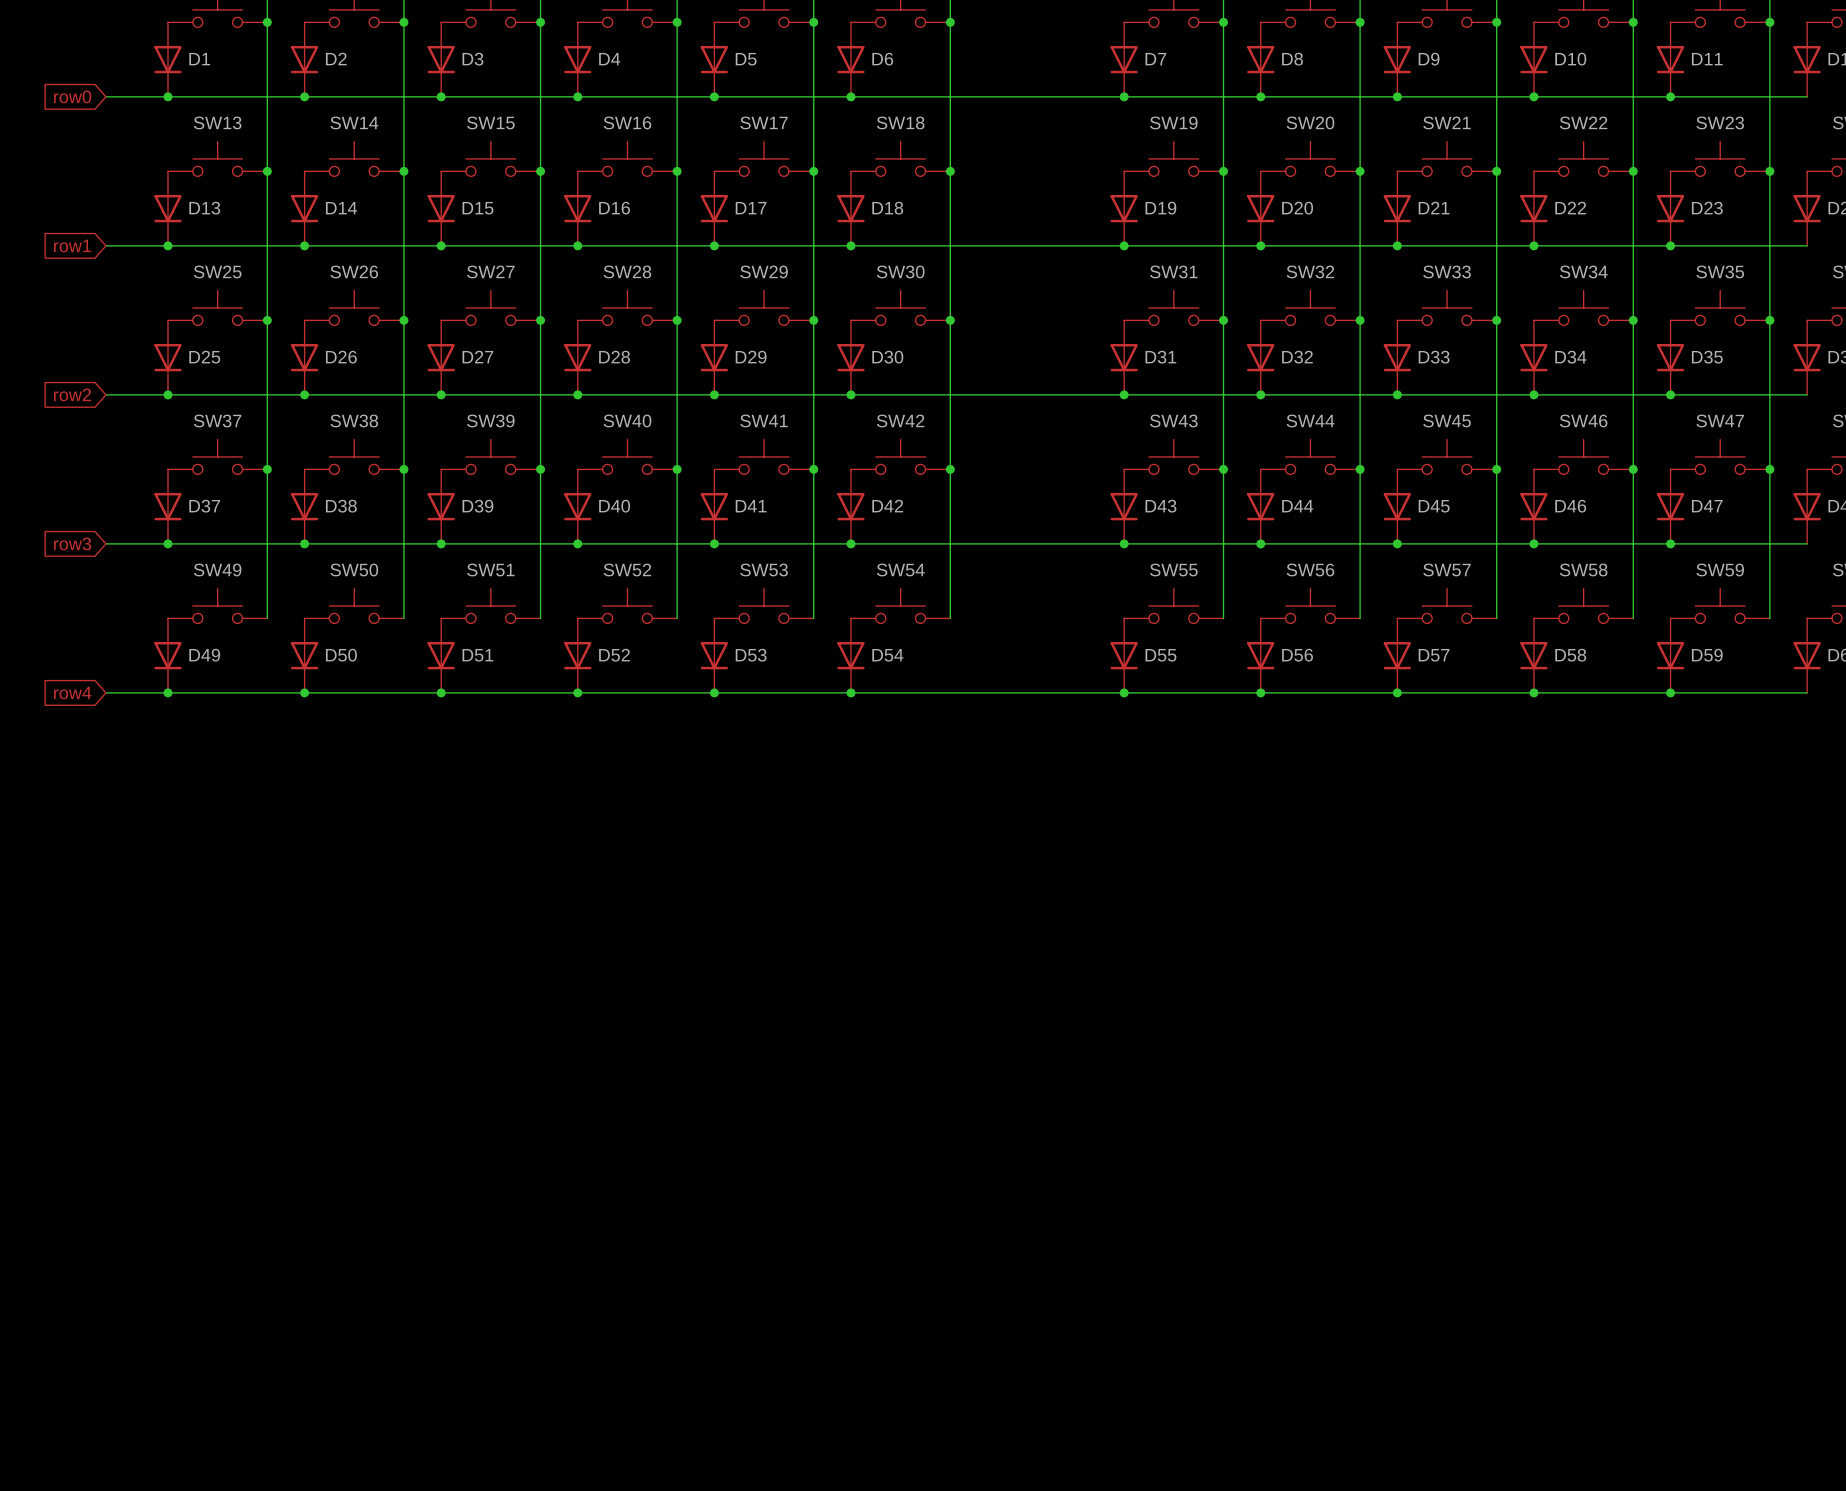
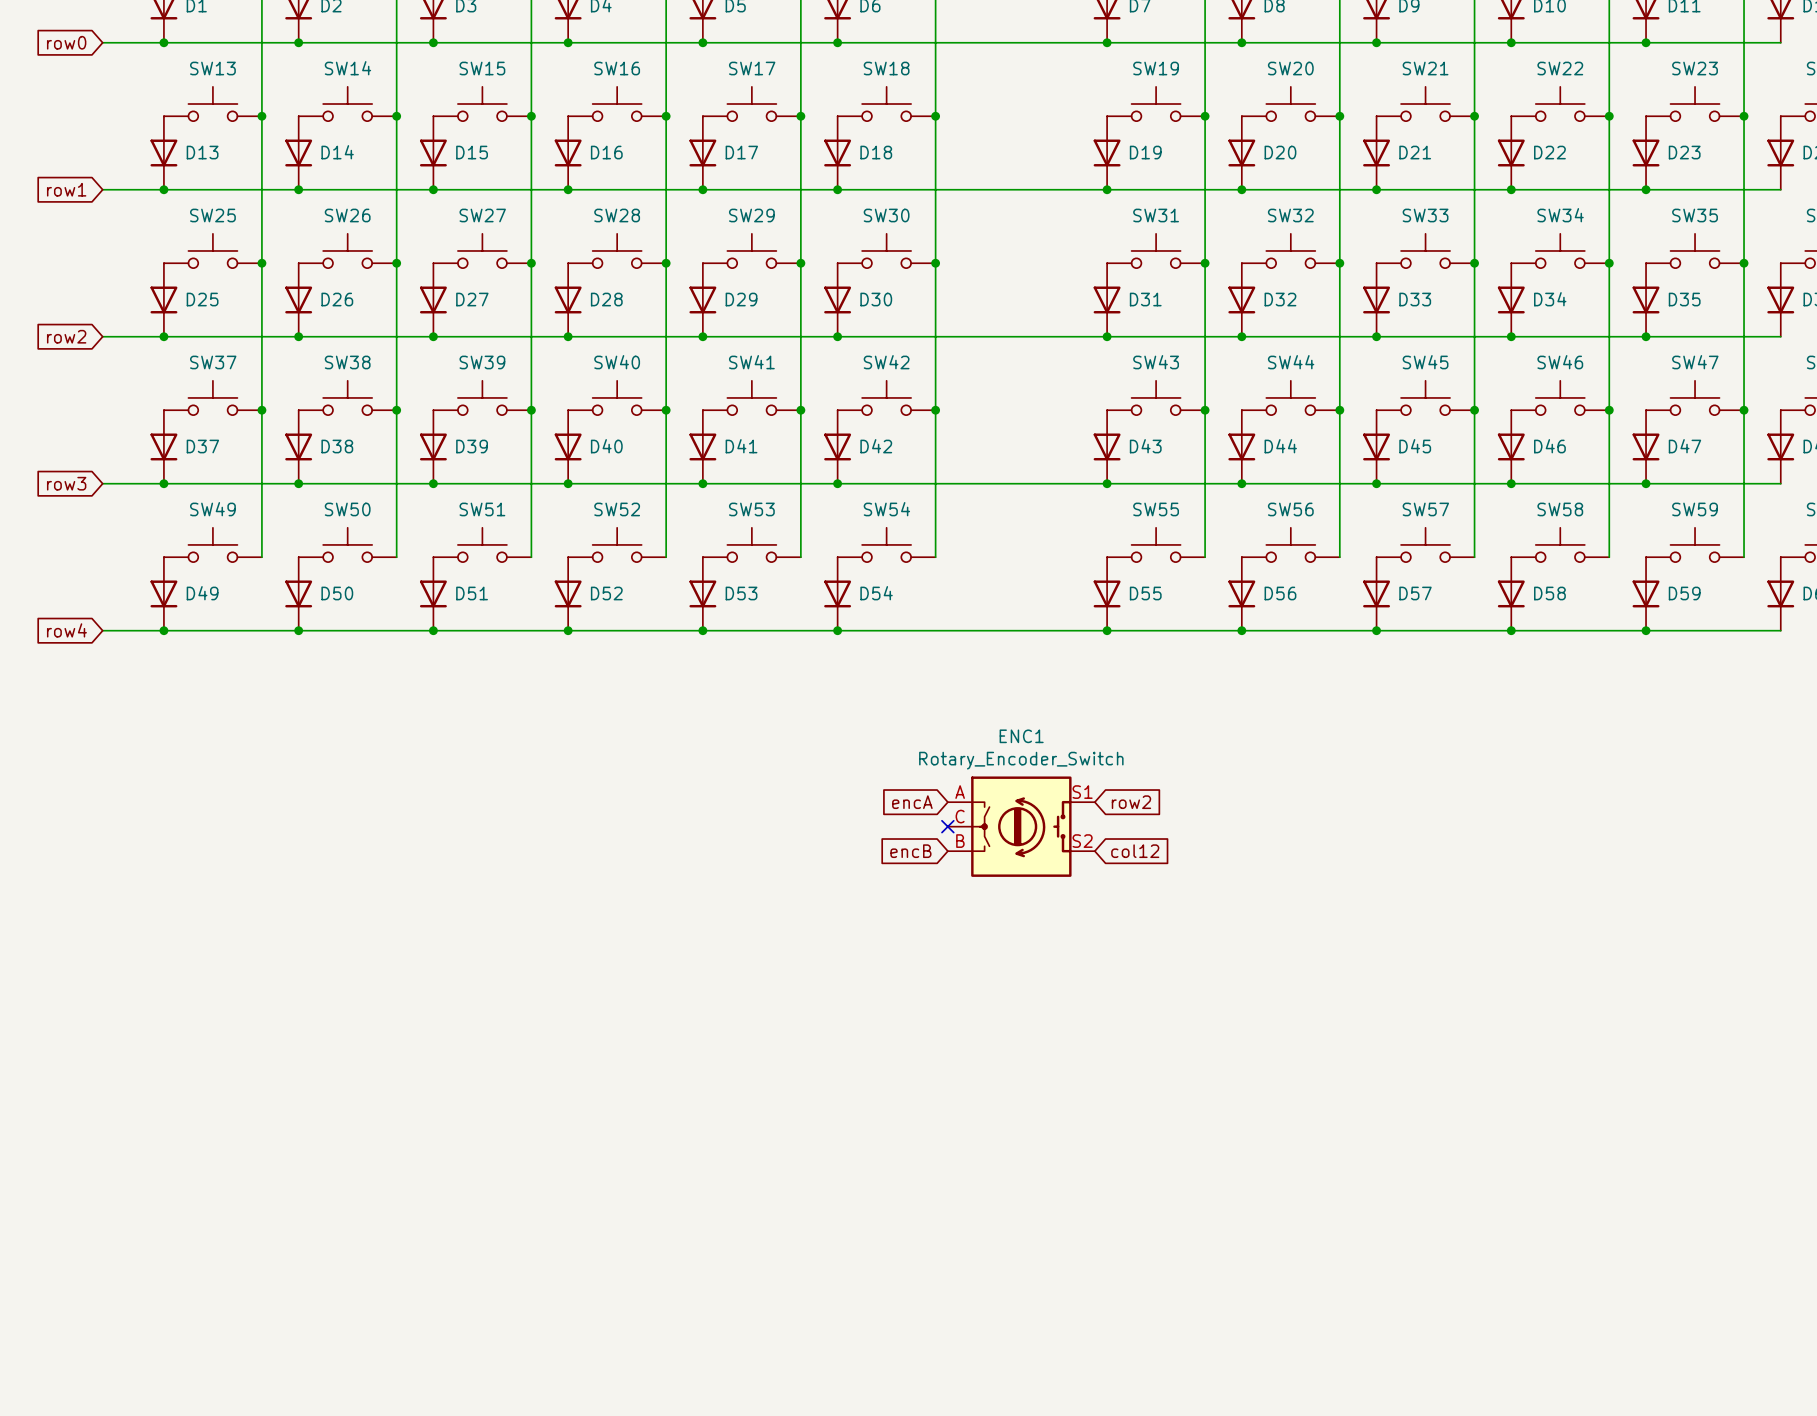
global label: none -> encA (912, 802)
global label: none -> row2 (1131, 802)
no-connect mark: none -> (947, 826)
ENC1: none -> Rotary_Encoder_Switch (1021, 826)
global label: none -> encB (910, 851)
global label: none -> col12 (1135, 851)

